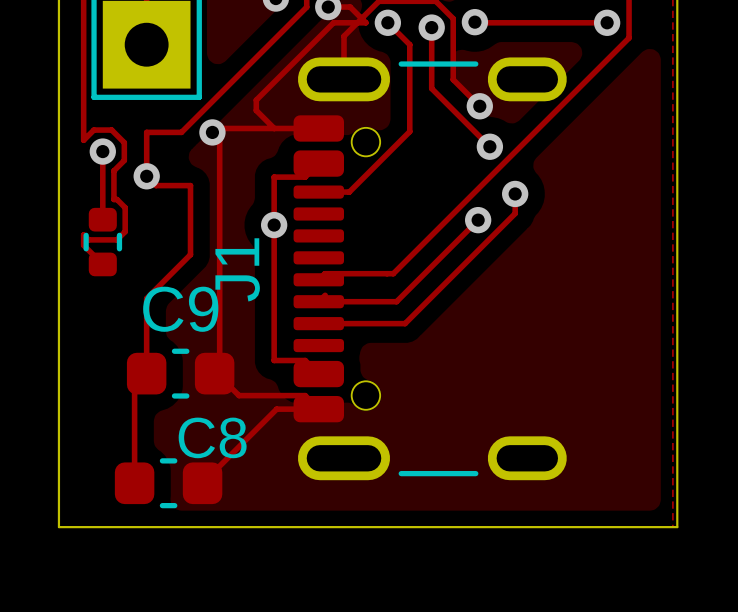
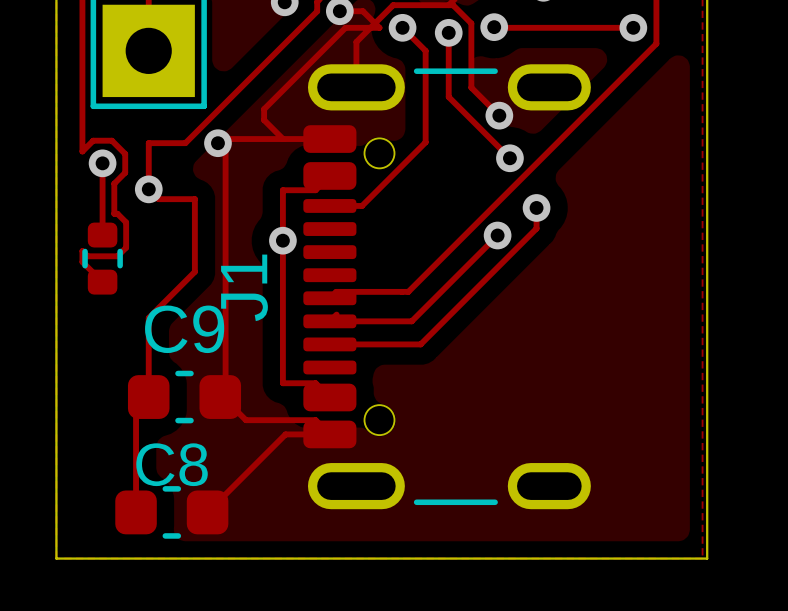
C8 name position: C8 (212, 437) -> C8 (172, 464)

